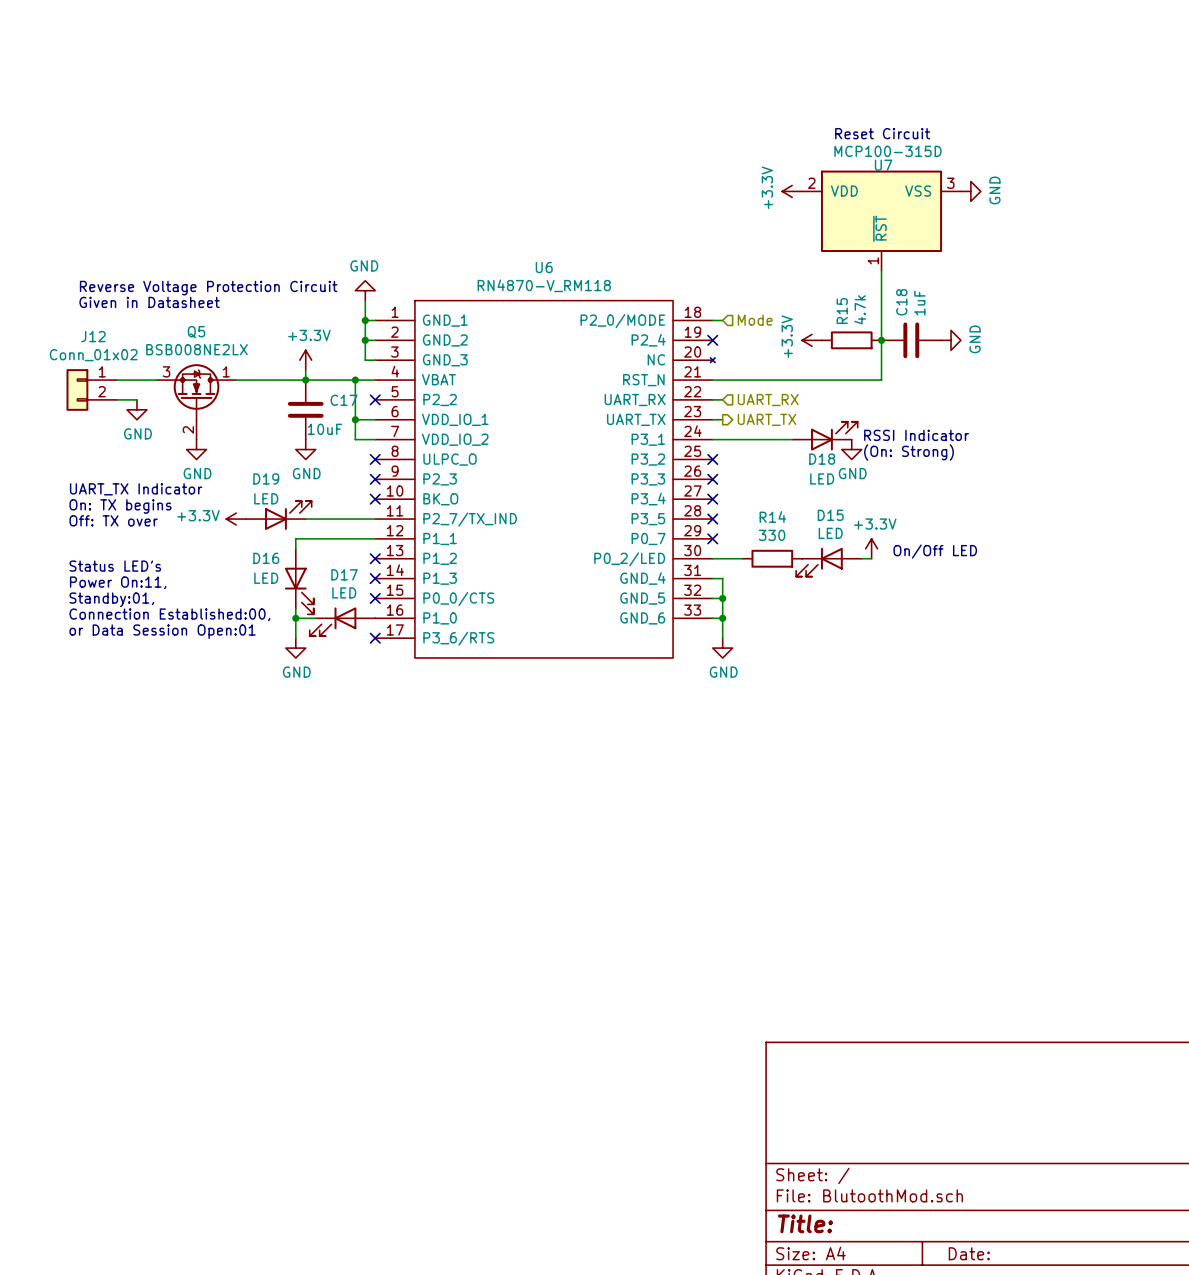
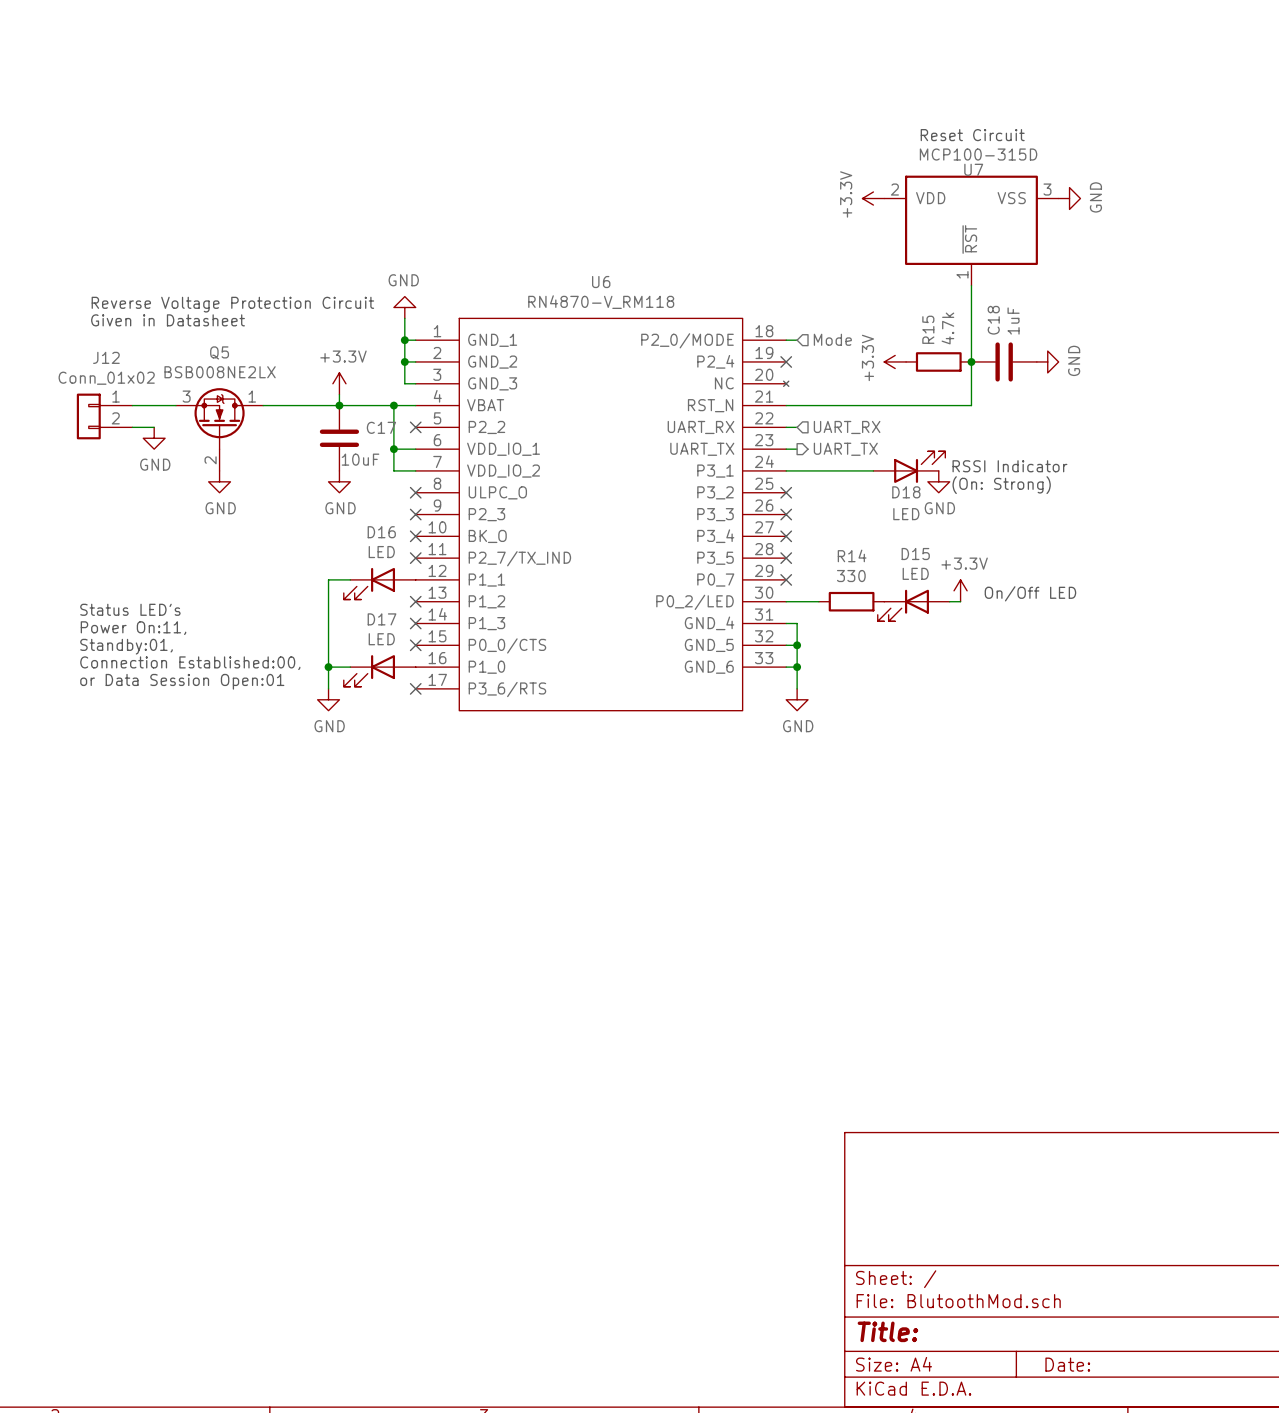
text: UART_TX Indicator (136, 489) -> none
text: On: TX begins (120, 506) -> none
D19: LED (278, 515) -> none
power symbol: +3.3V (236, 519) -> none
wire: (305, 519) (375, 519) -> none
no-connect mark: none -> (415, 558)
text: Off: TX over (113, 520) -> none
D16 name position: D16 (266, 558) -> D16 (381, 532)
D16 position: (299, 581) -> (379, 583)
D16 rotation: 0° (299, 591) -> 90° clockwise (369, 583)

